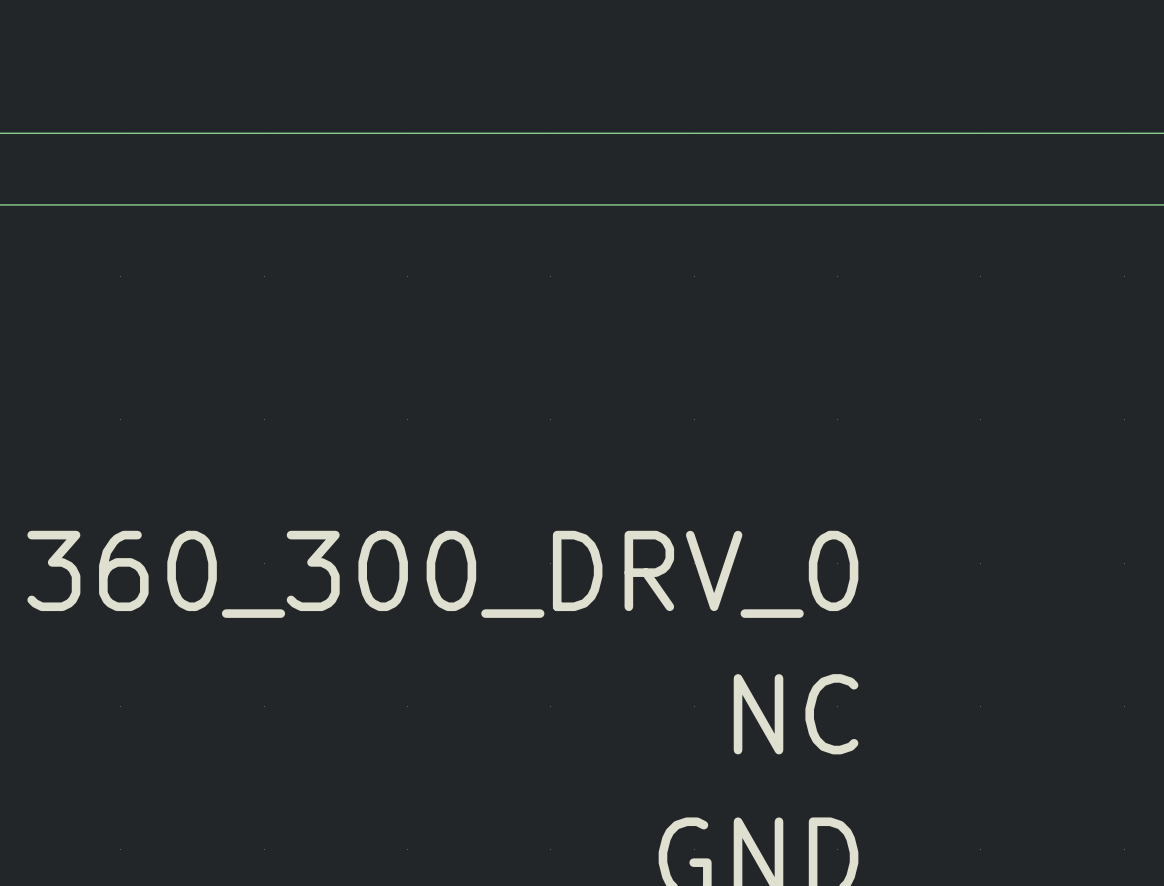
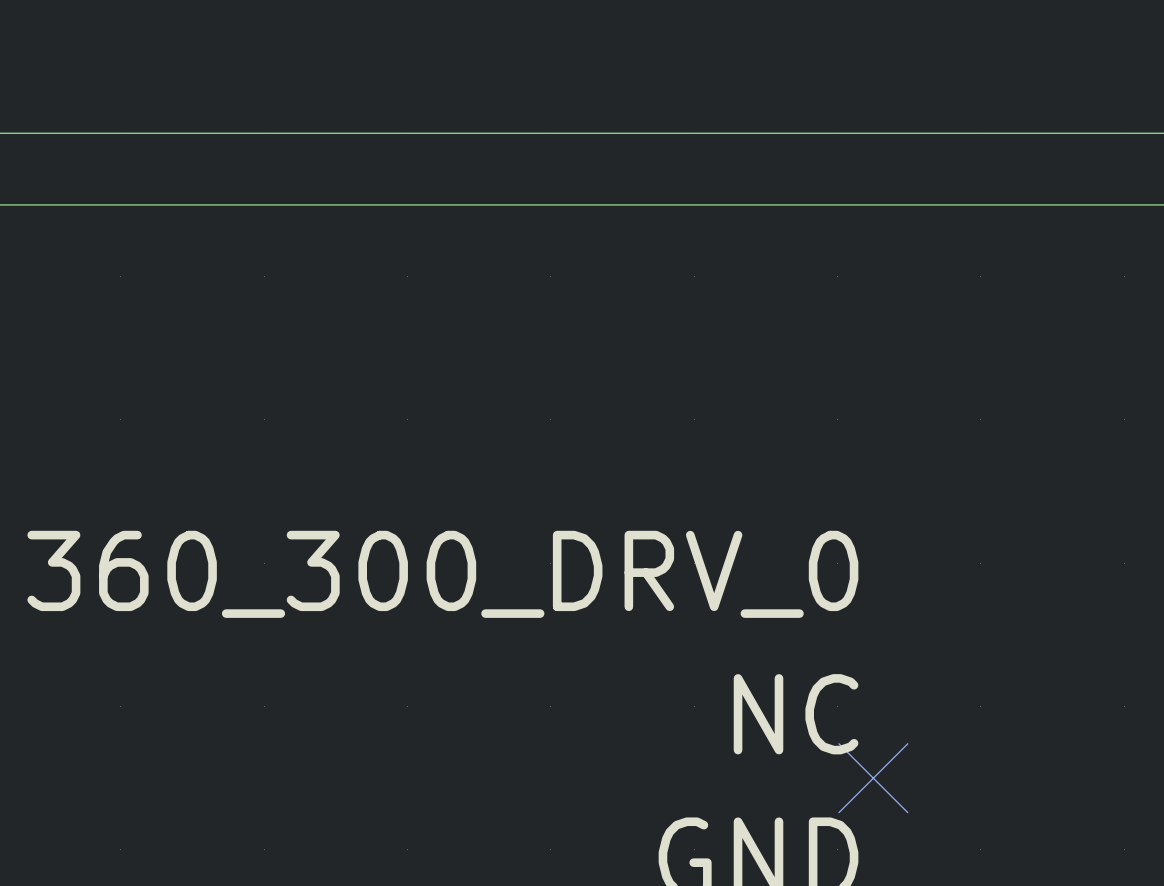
no-connect mark: none -> (873, 778)

